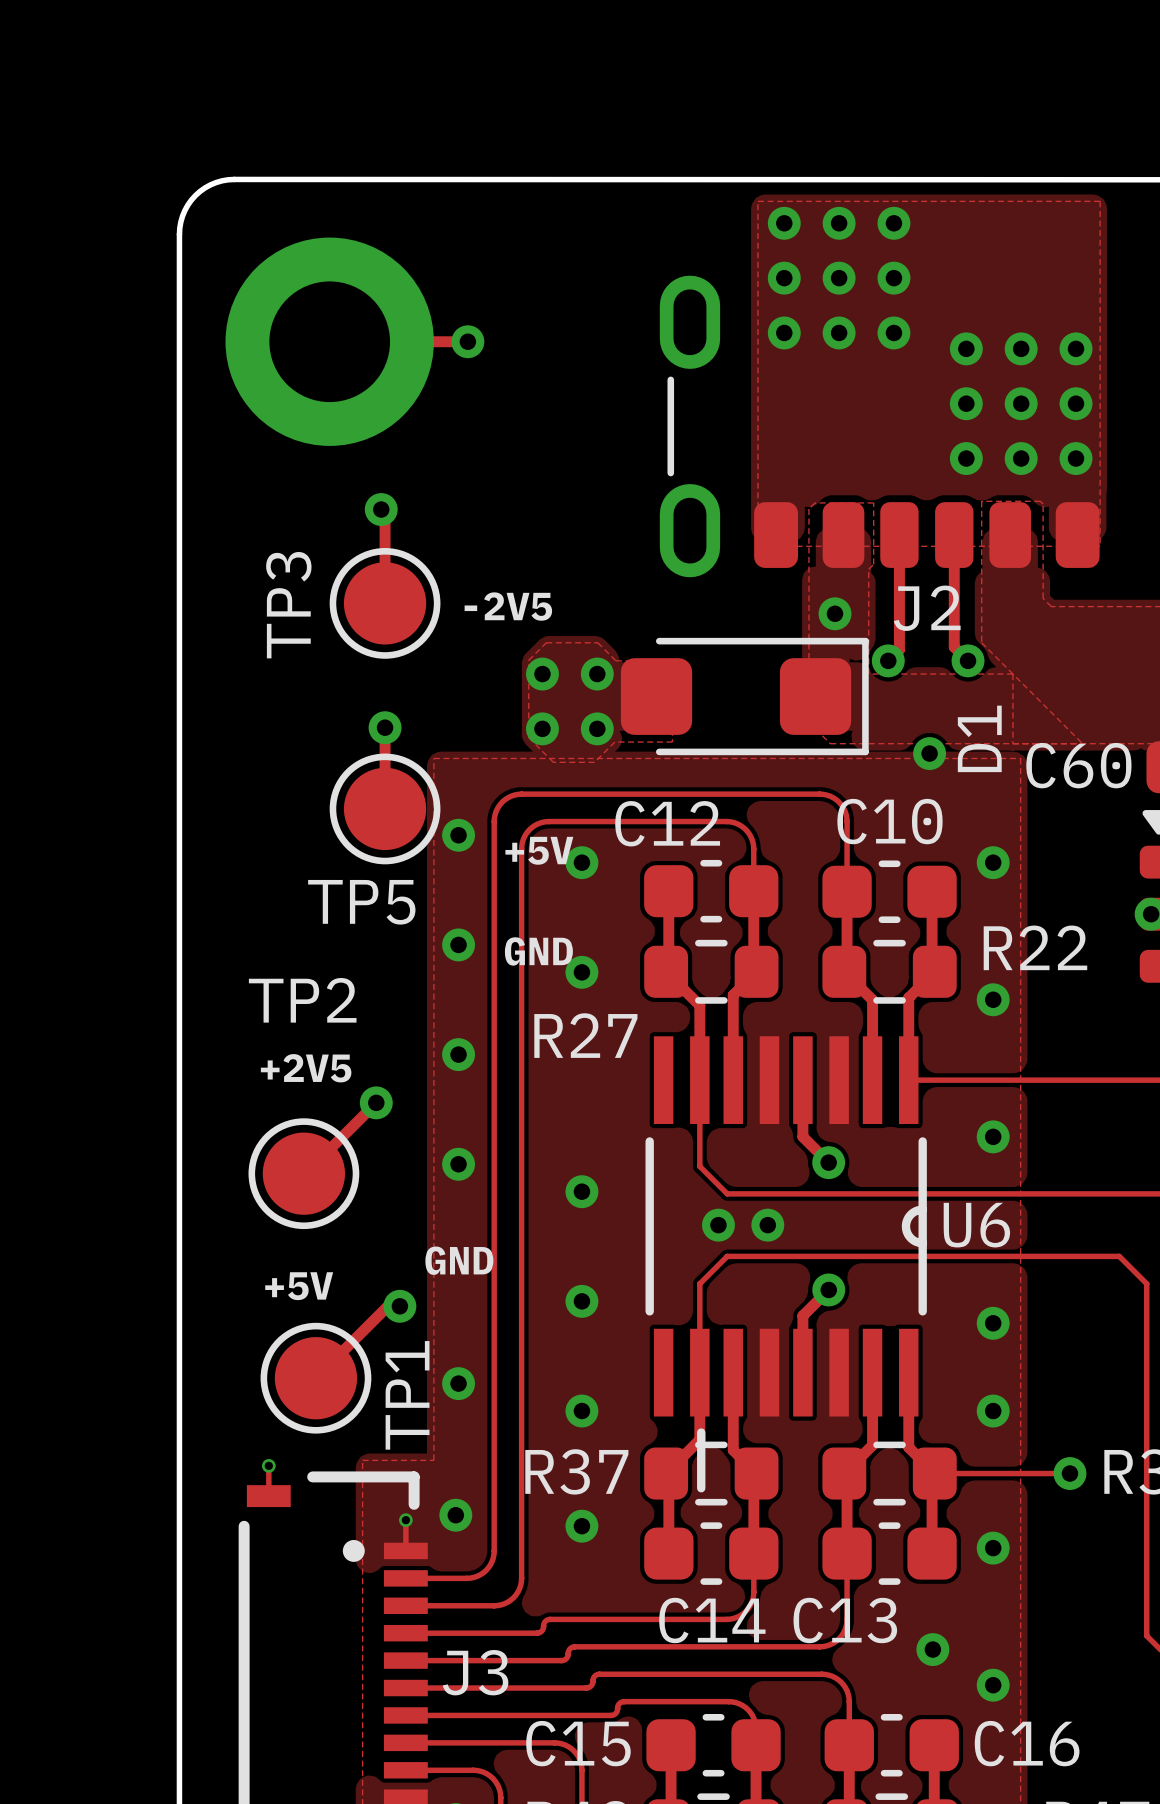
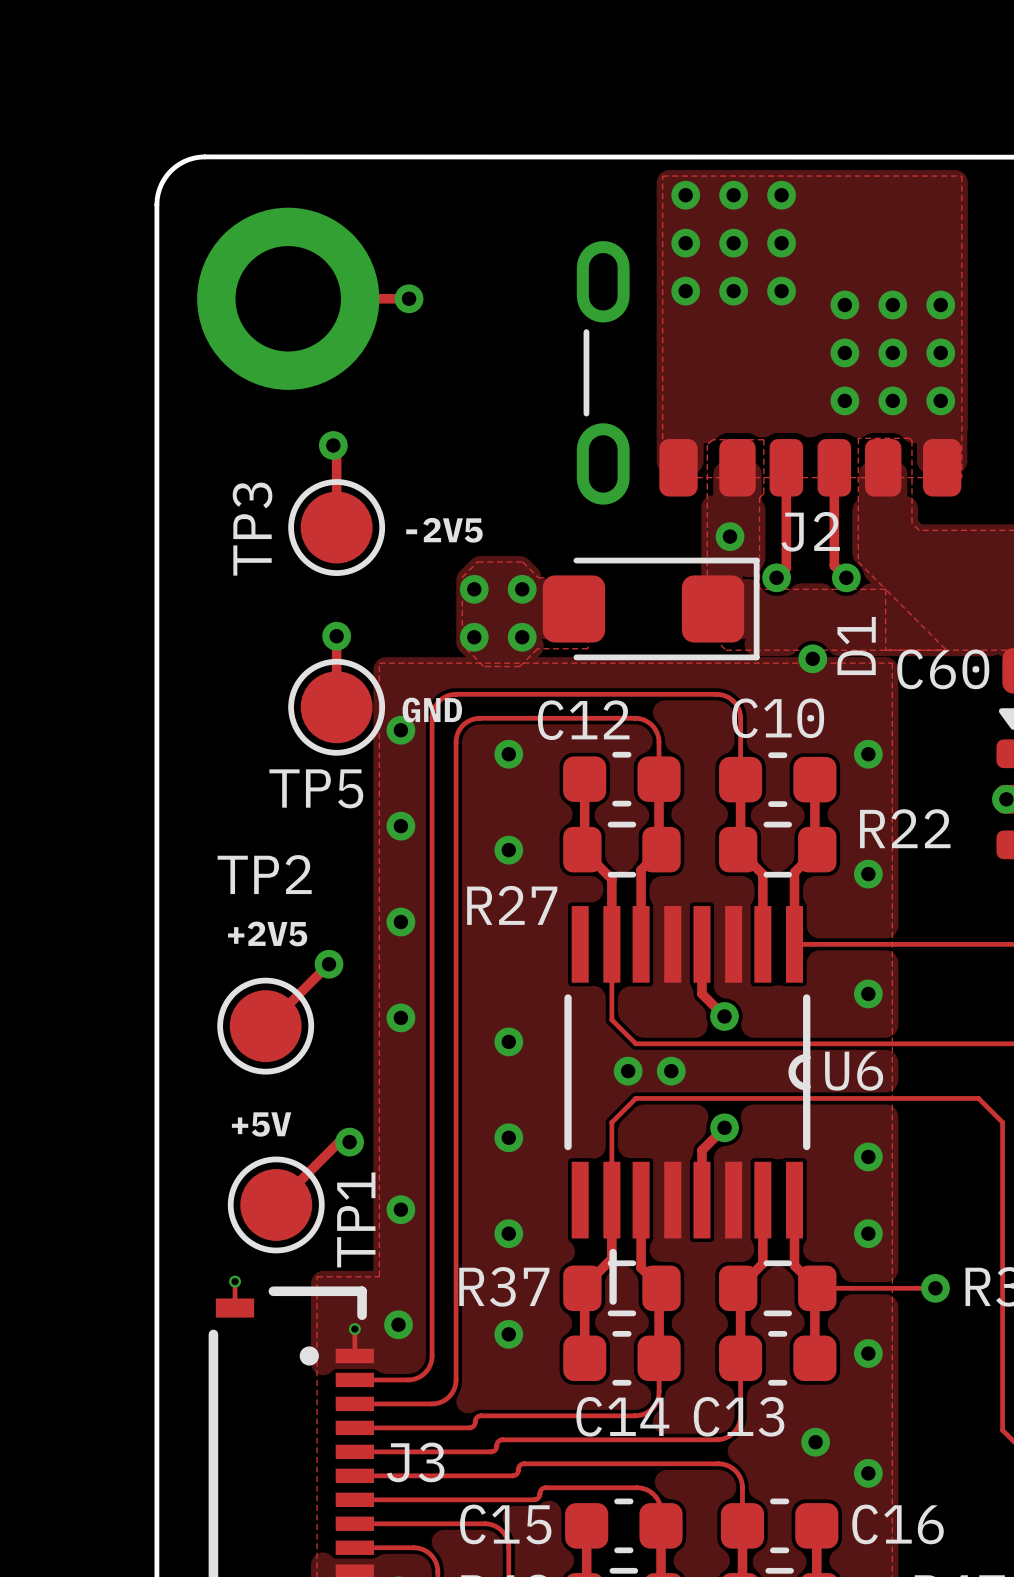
text: +5V (539, 850) -> none
text position: GND (538, 951) -> GND (432, 710)
text: GND (459, 1260) -> none

